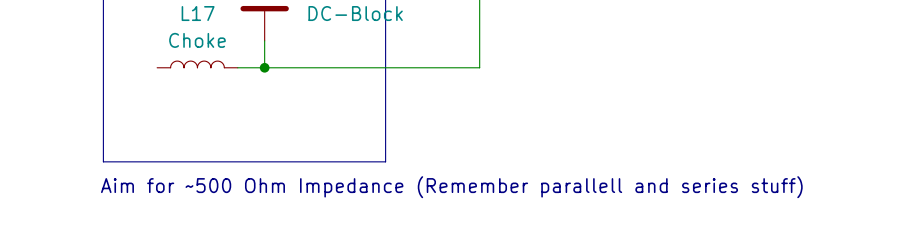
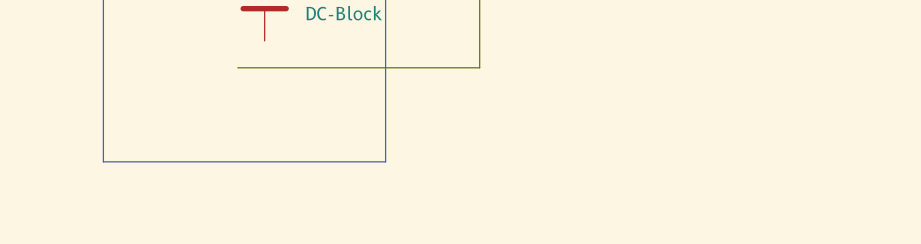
wire: (264, 40) (264, 67) -> none
L17: Choke (197, 64) -> none
junction: (264, 67) -> none
text: Aim for ~500 Ohm Impedance (Remember parallell and series stuff) (451, 187) -> none

